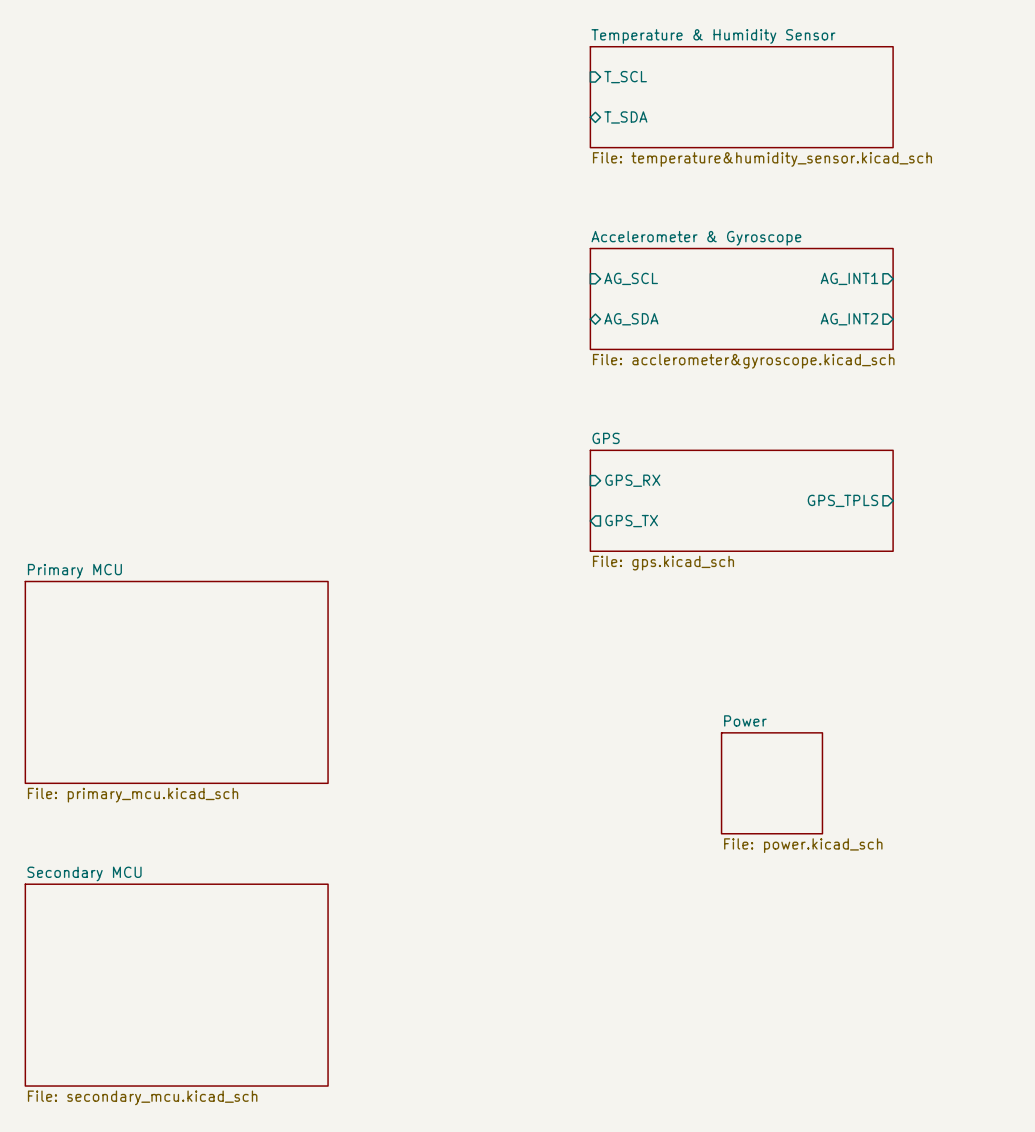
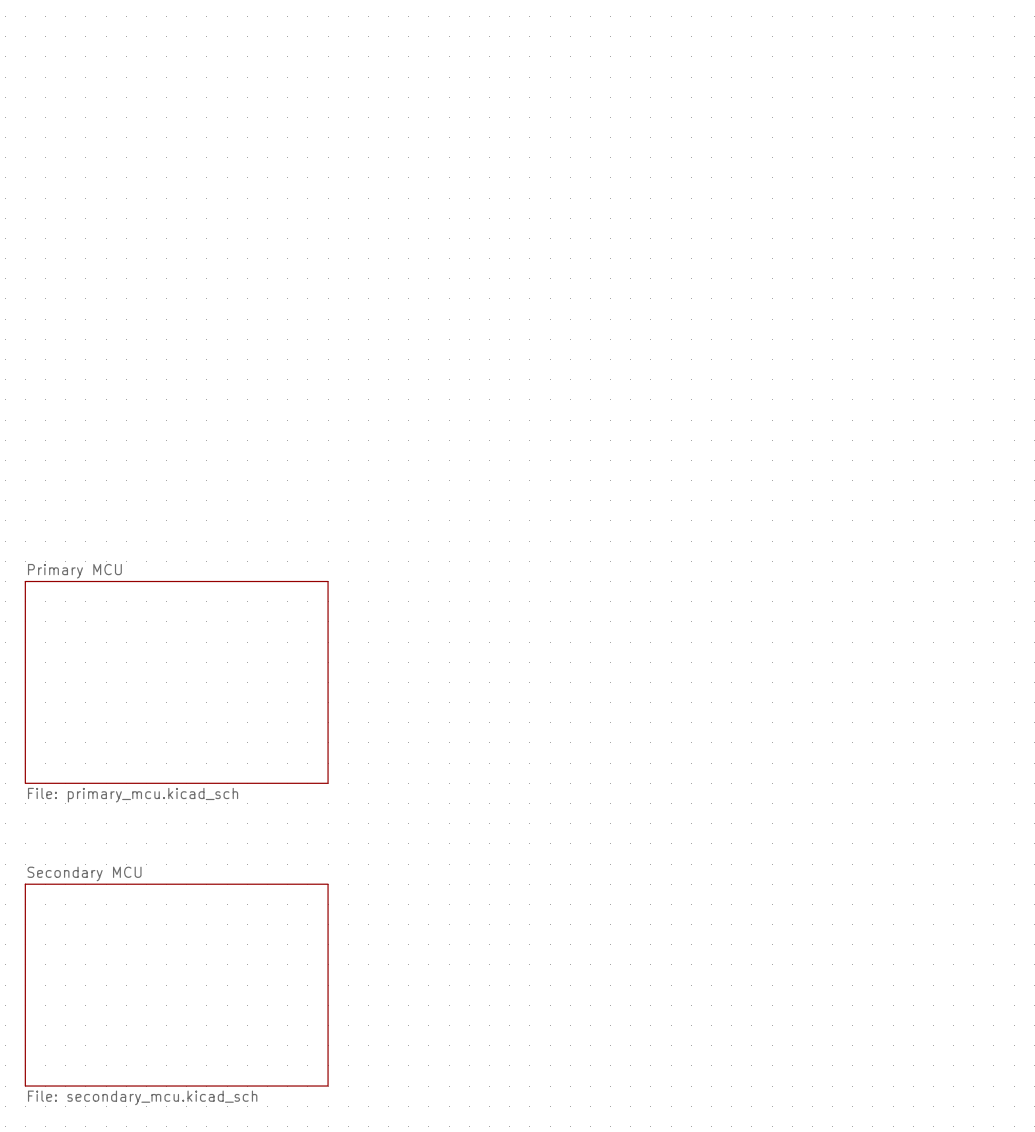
sheet pin: T_SCL (625, 77) -> none
sheet Temperature & Humidity Sensor: File: temperature&humidity_sensor.kicad_sch (741, 97) -> none
sheet pin: T_SDA (625, 117) -> none
sheet pin: AG_SCL (631, 278) -> none
sheet pin: AG_INT1 (849, 278) -> none
sheet Accelerometer & Gyroscope: File: acclerometer&gyroscope.kicad_sch (741, 298) -> none
sheet pin: AG_SDA (631, 319) -> none
sheet pin: AG_INT2 (849, 319) -> none
sheet pin: GPS_RX (632, 480) -> none
sheet GPS: File: gps.kicad_sch (741, 500) -> none
sheet pin: GPS_TPLS (842, 500) -> none
sheet pin: GPS_TX (631, 521) -> none
sheet Power: File: power.kicad_sch (772, 783) -> none

